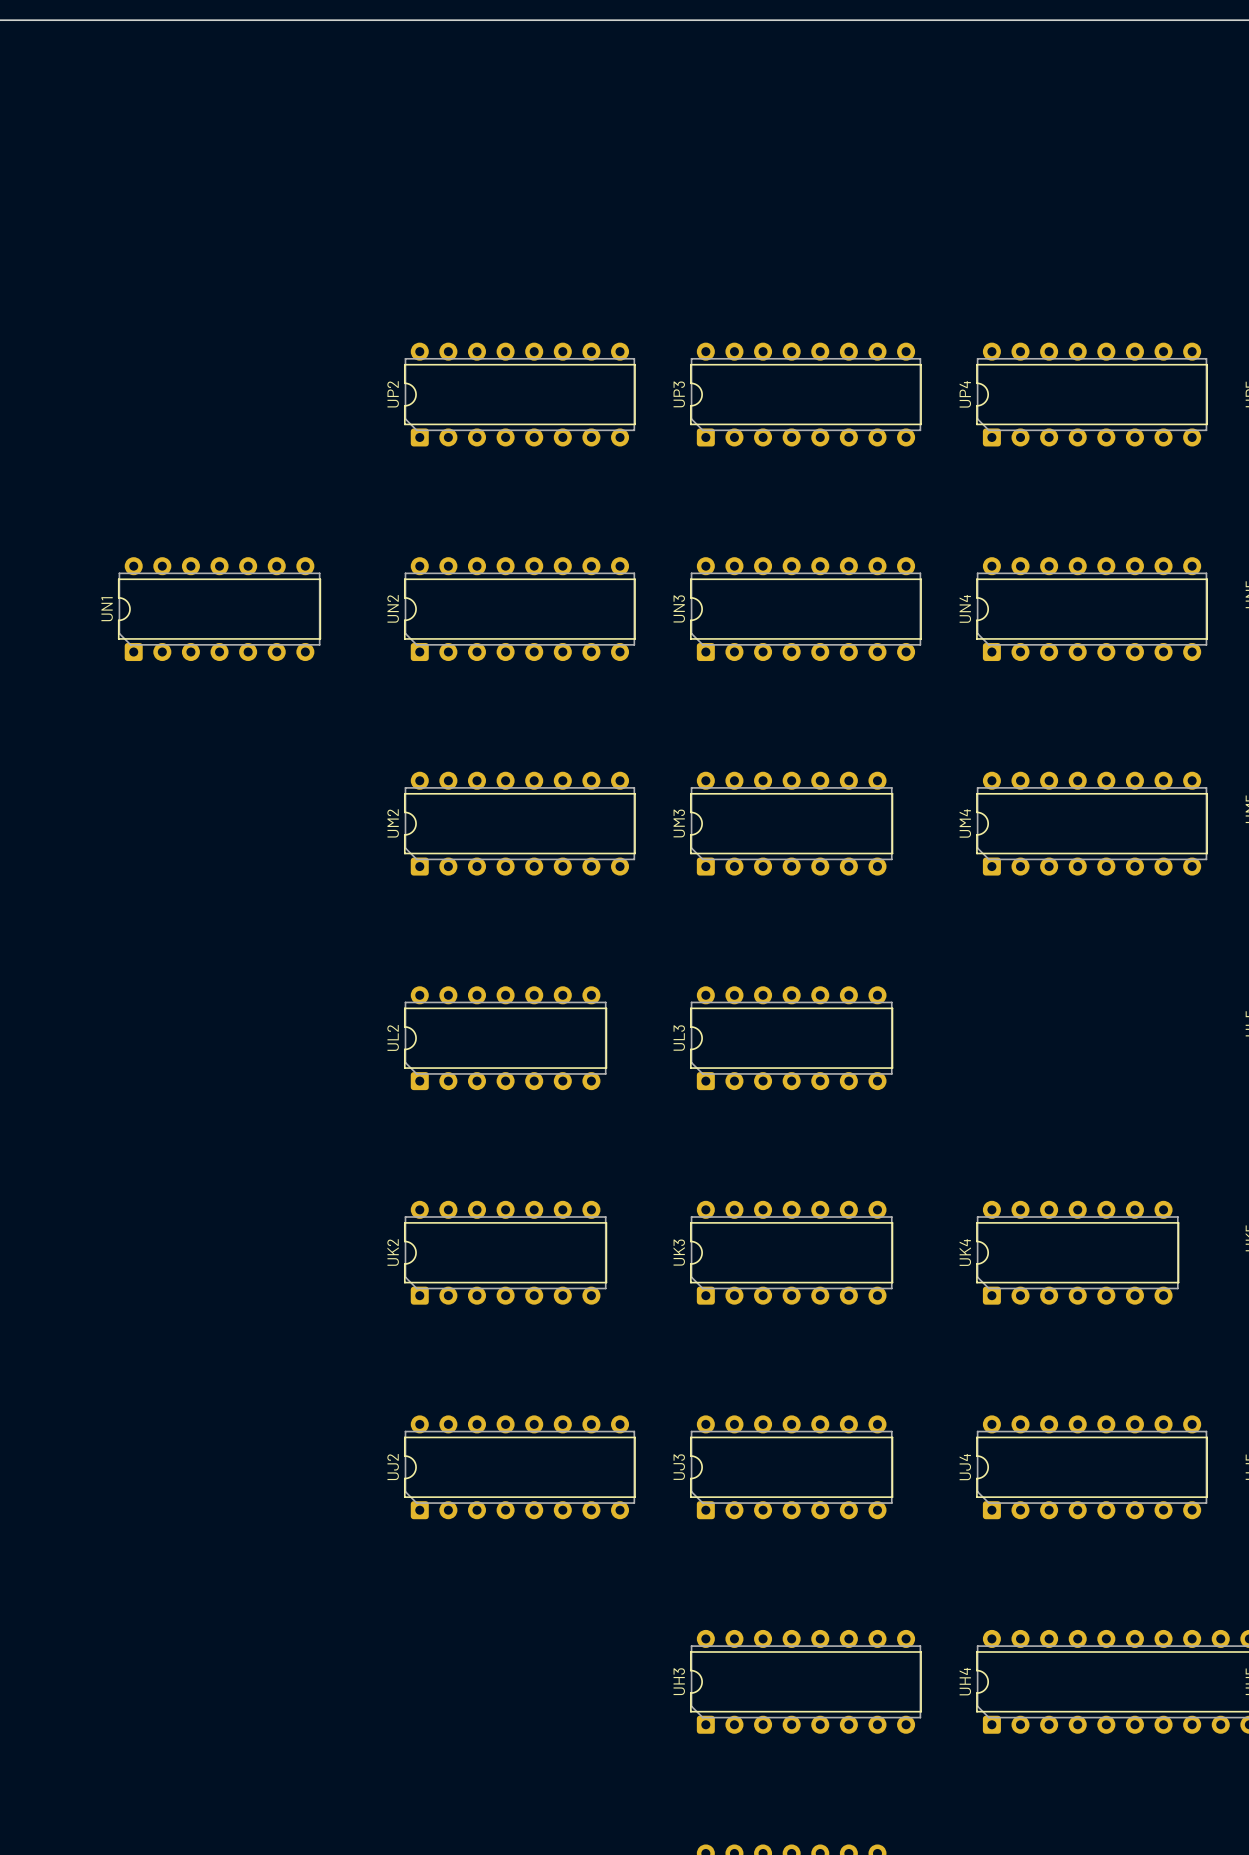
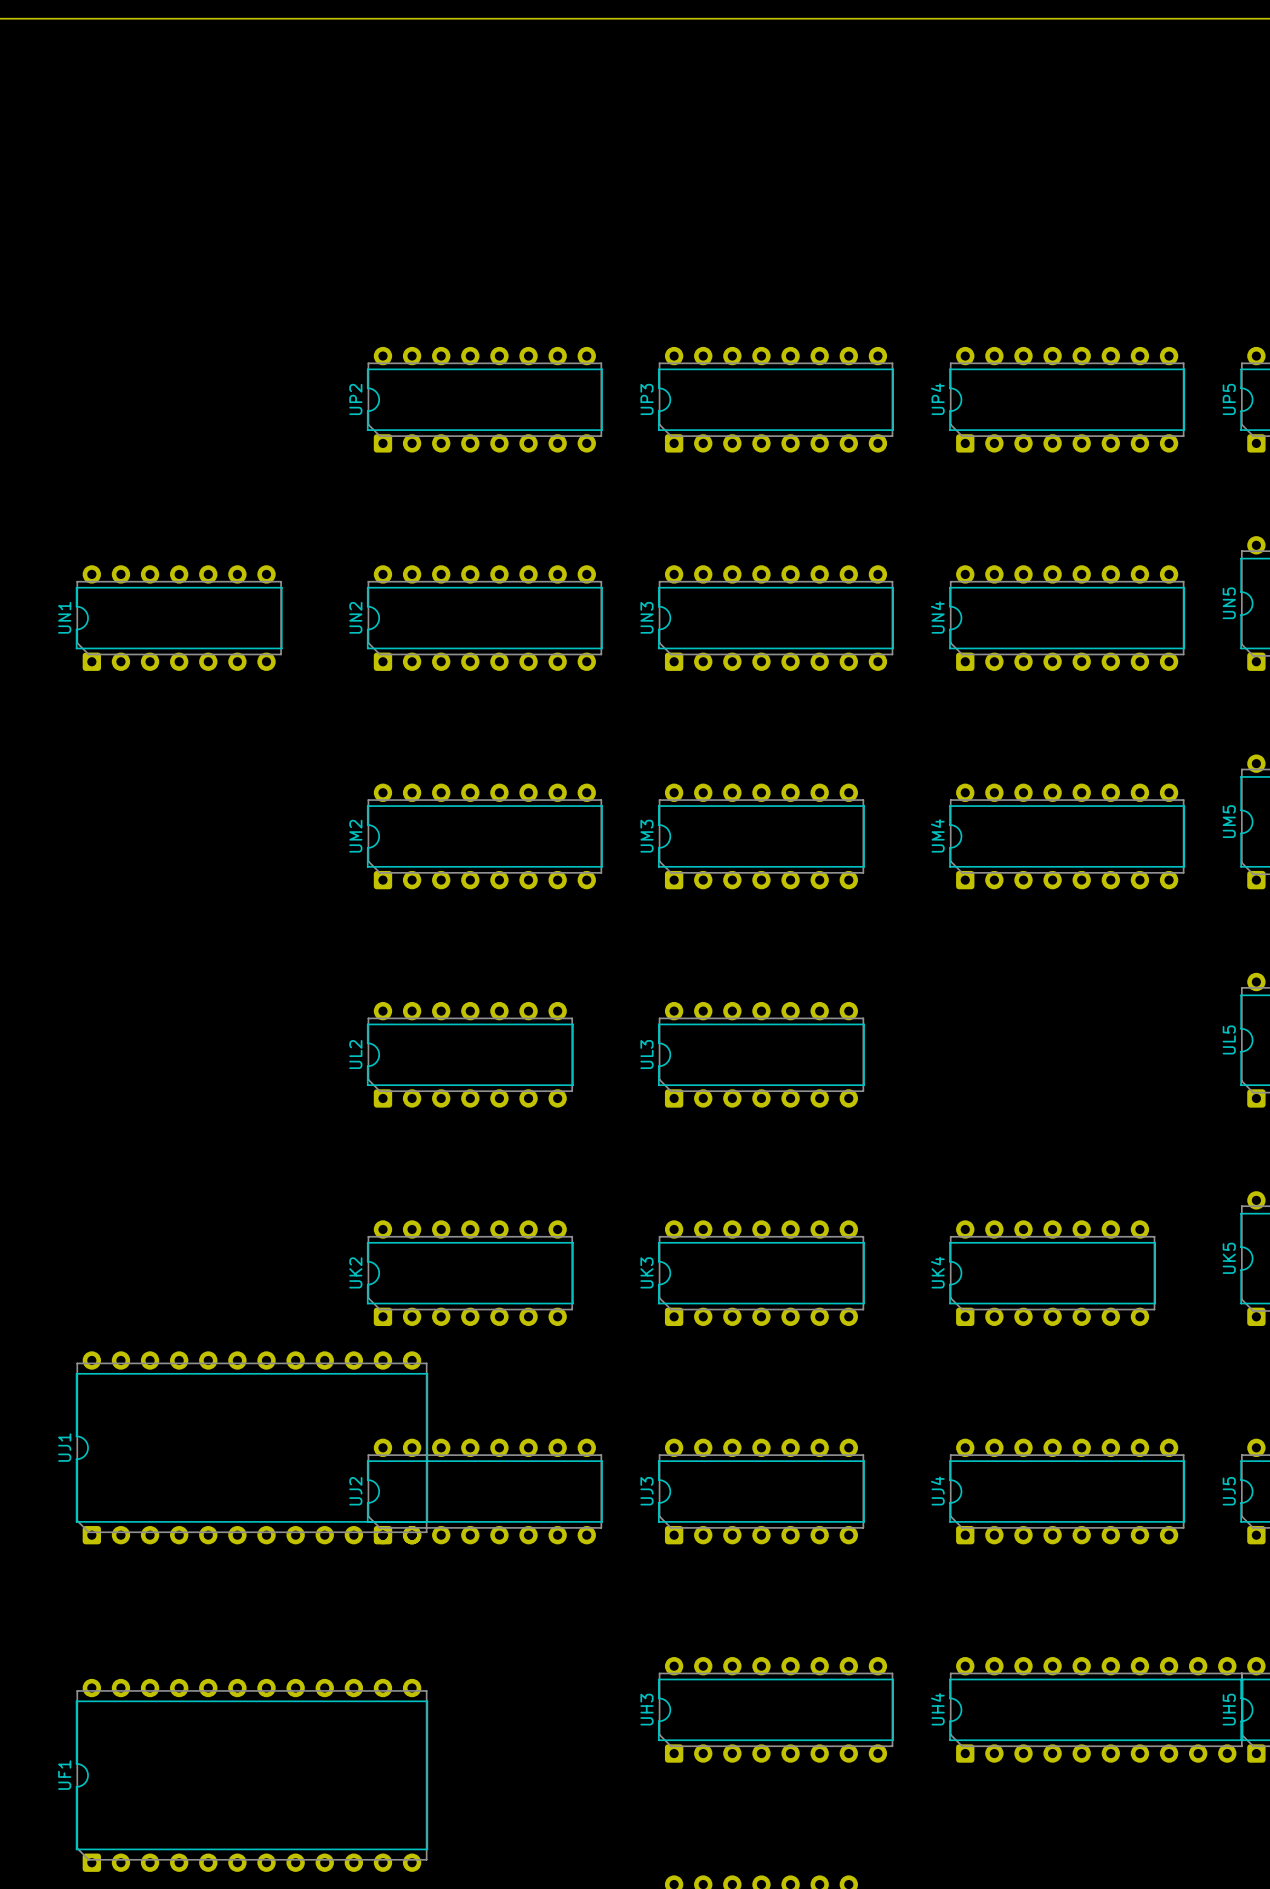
UJ1: none -> (251, 1447)
UF1: none -> (251, 1775)

